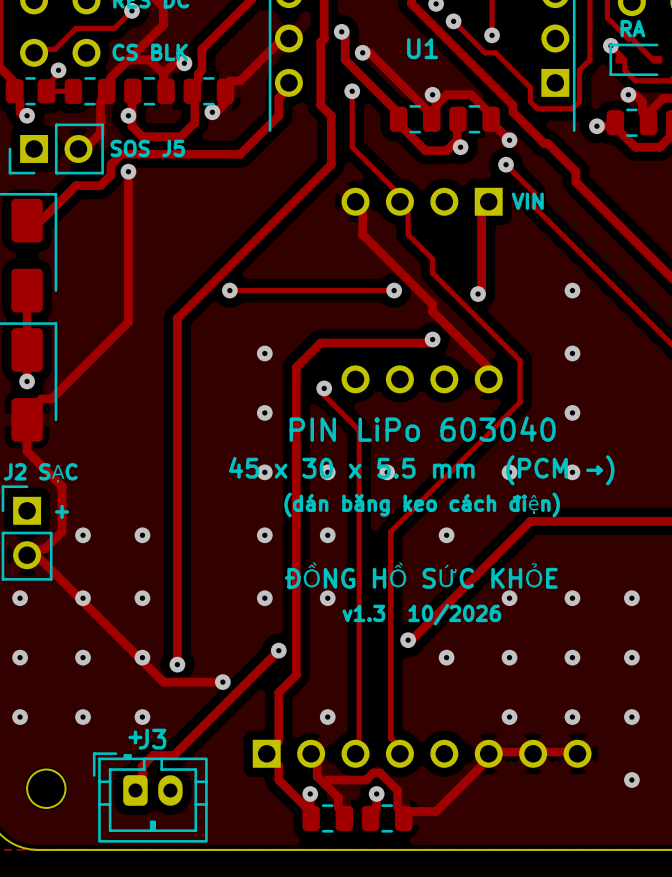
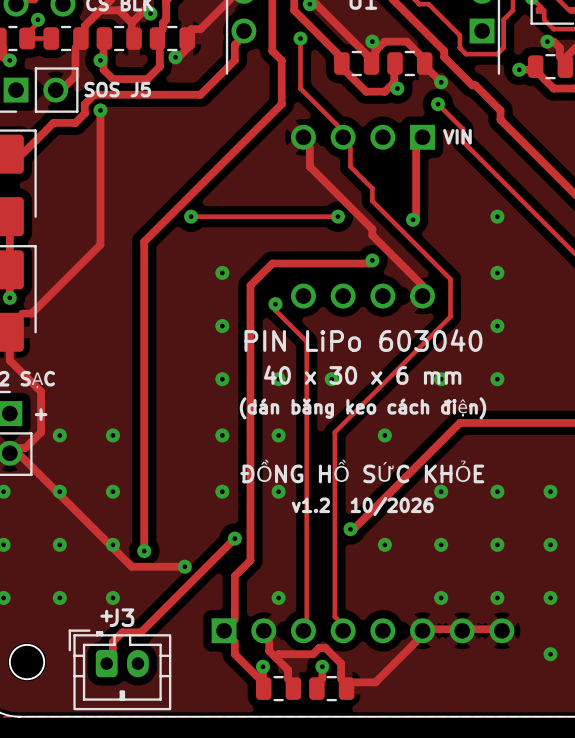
text: 45 x 30 x 5.5 mm (PCM →) (421, 470) -> 40 x 30 x 6 mm (362, 375)
text: v1.3 10/2026 (421, 614) -> v1.2 10/2026 (362, 506)

